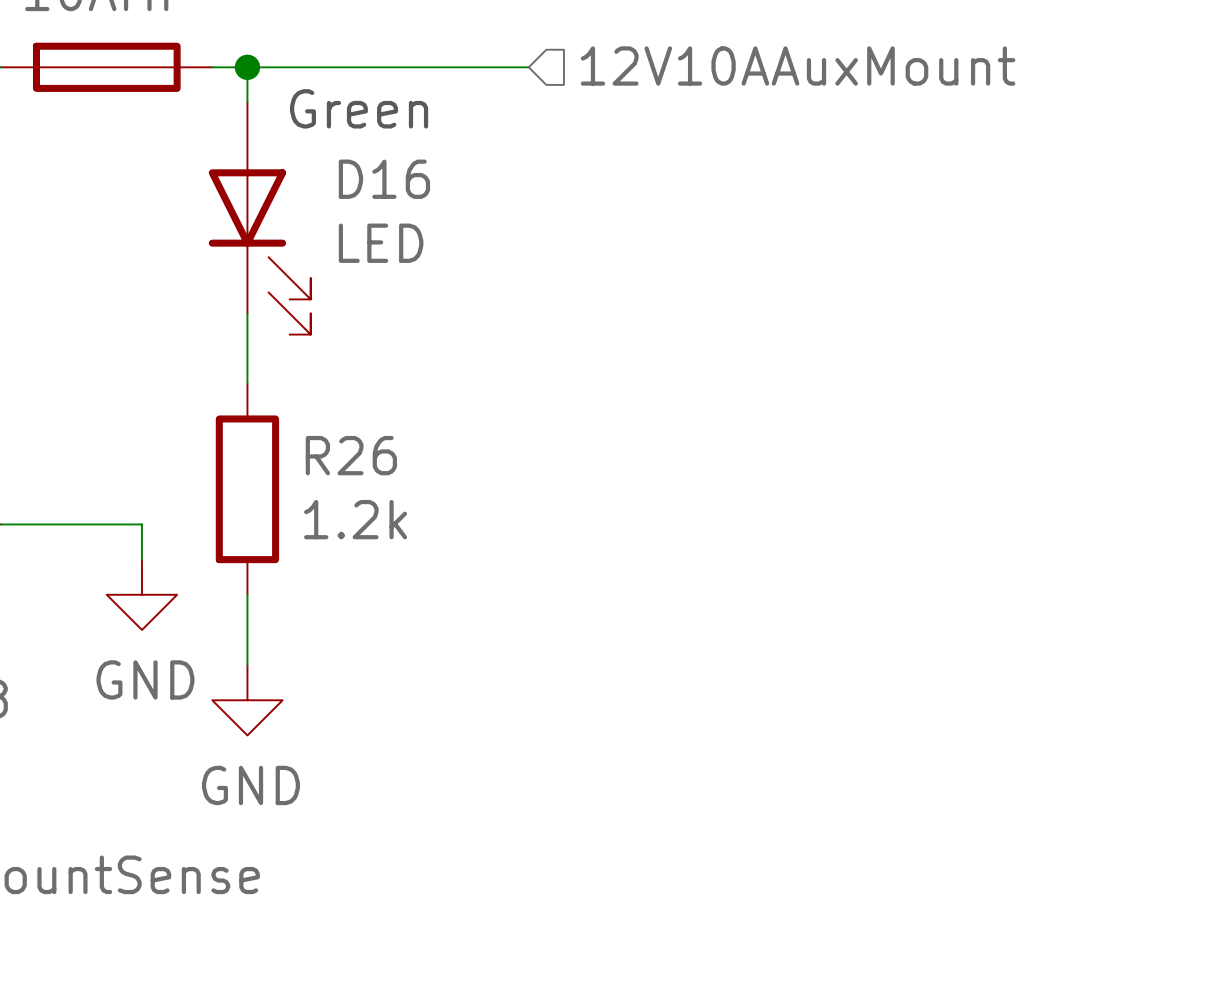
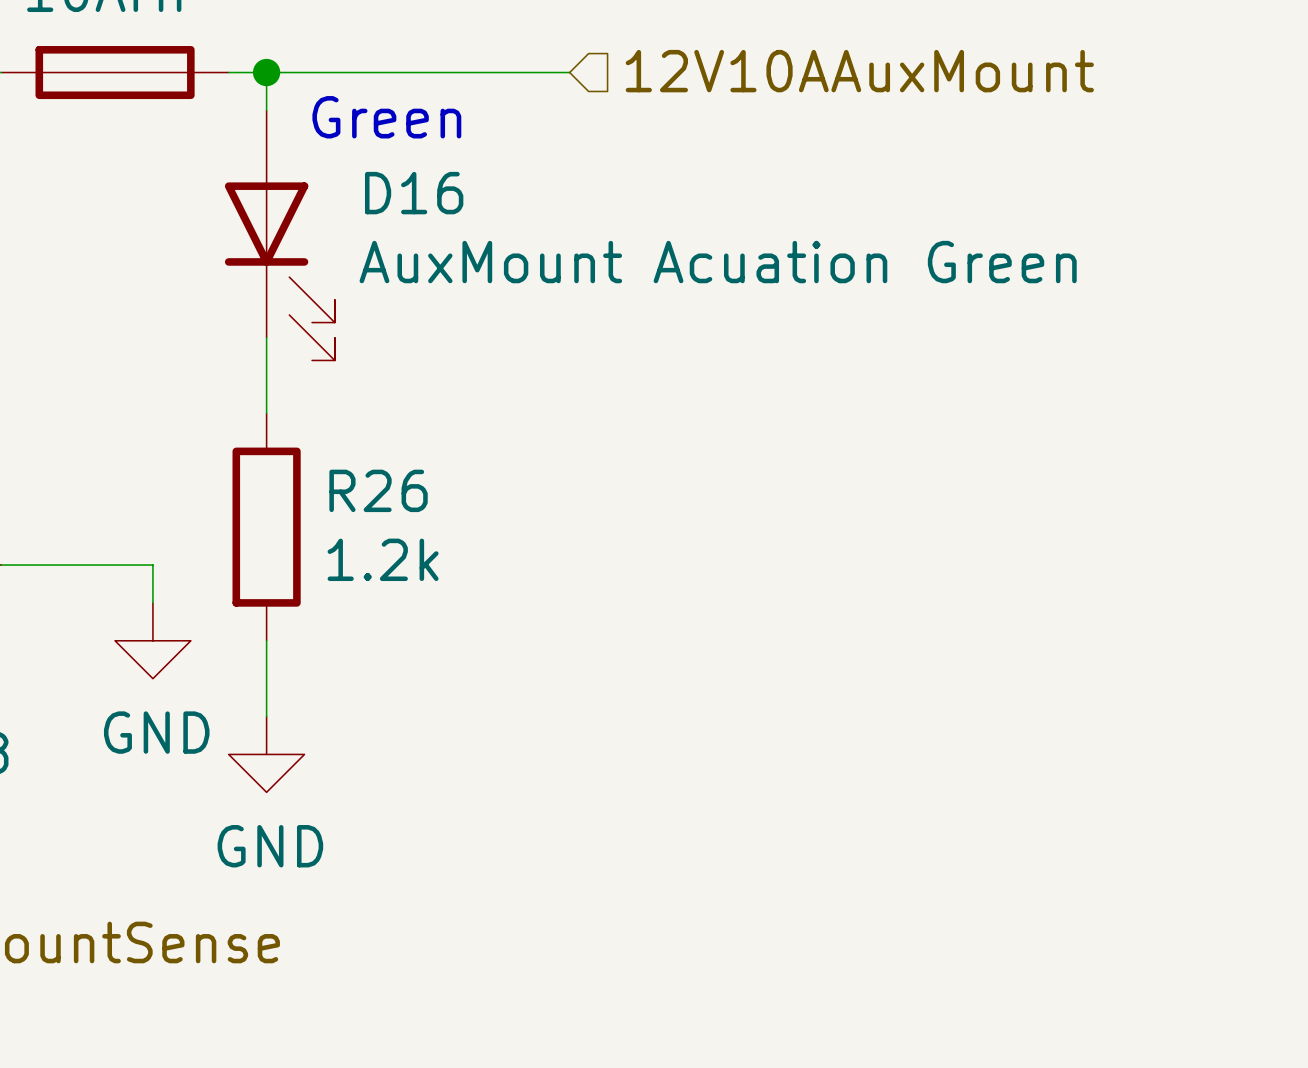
D16 value: LED (381, 243) -> AuxMount Acuation Green (718, 262)

